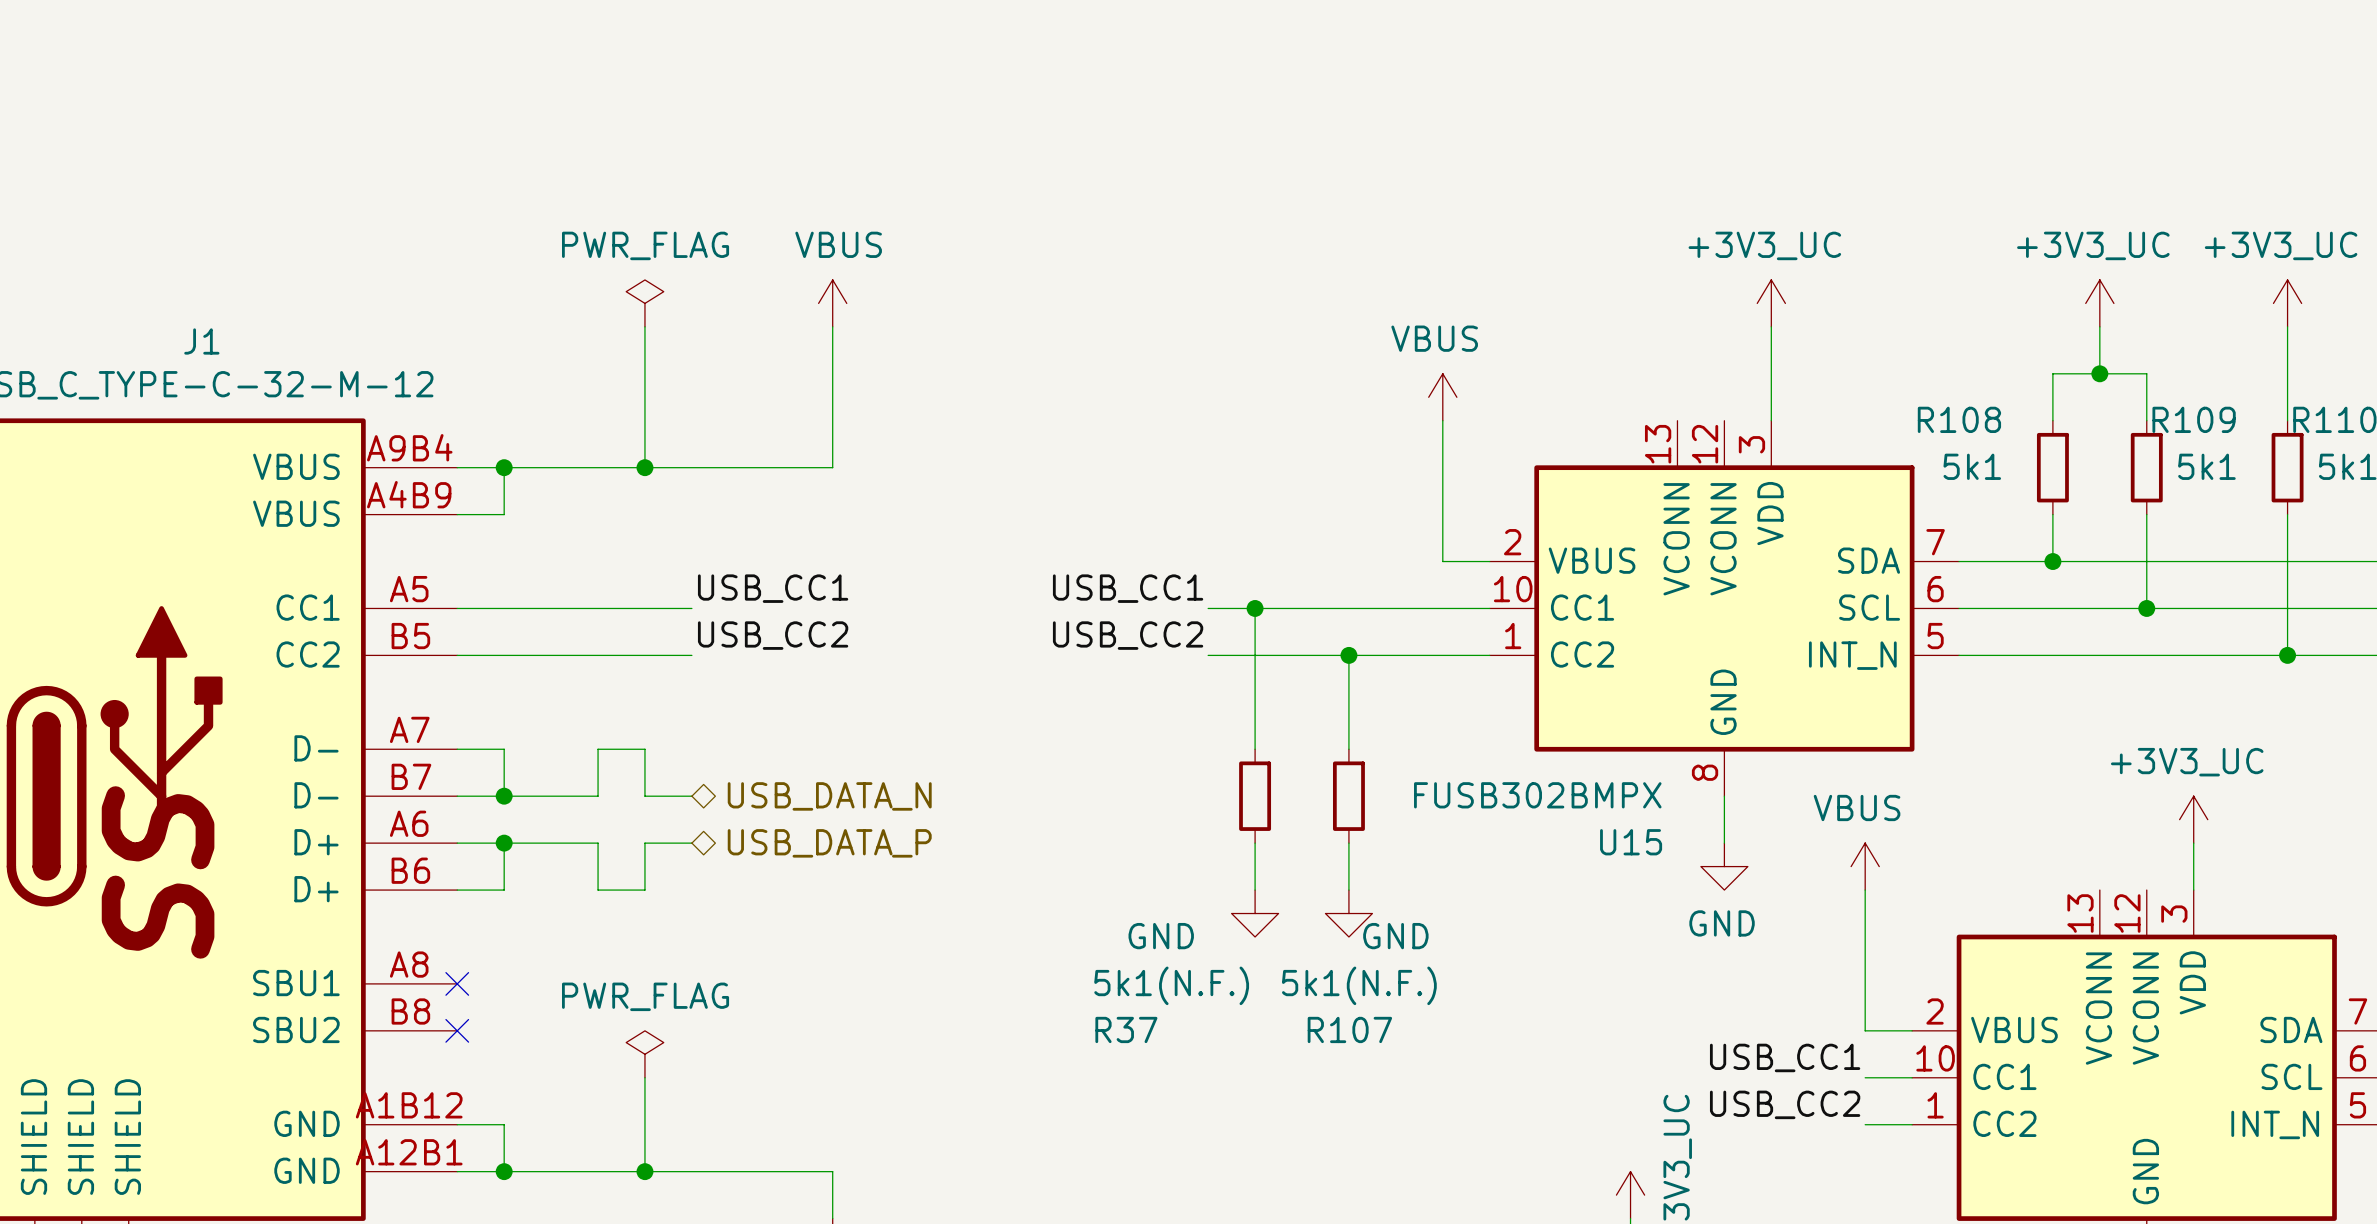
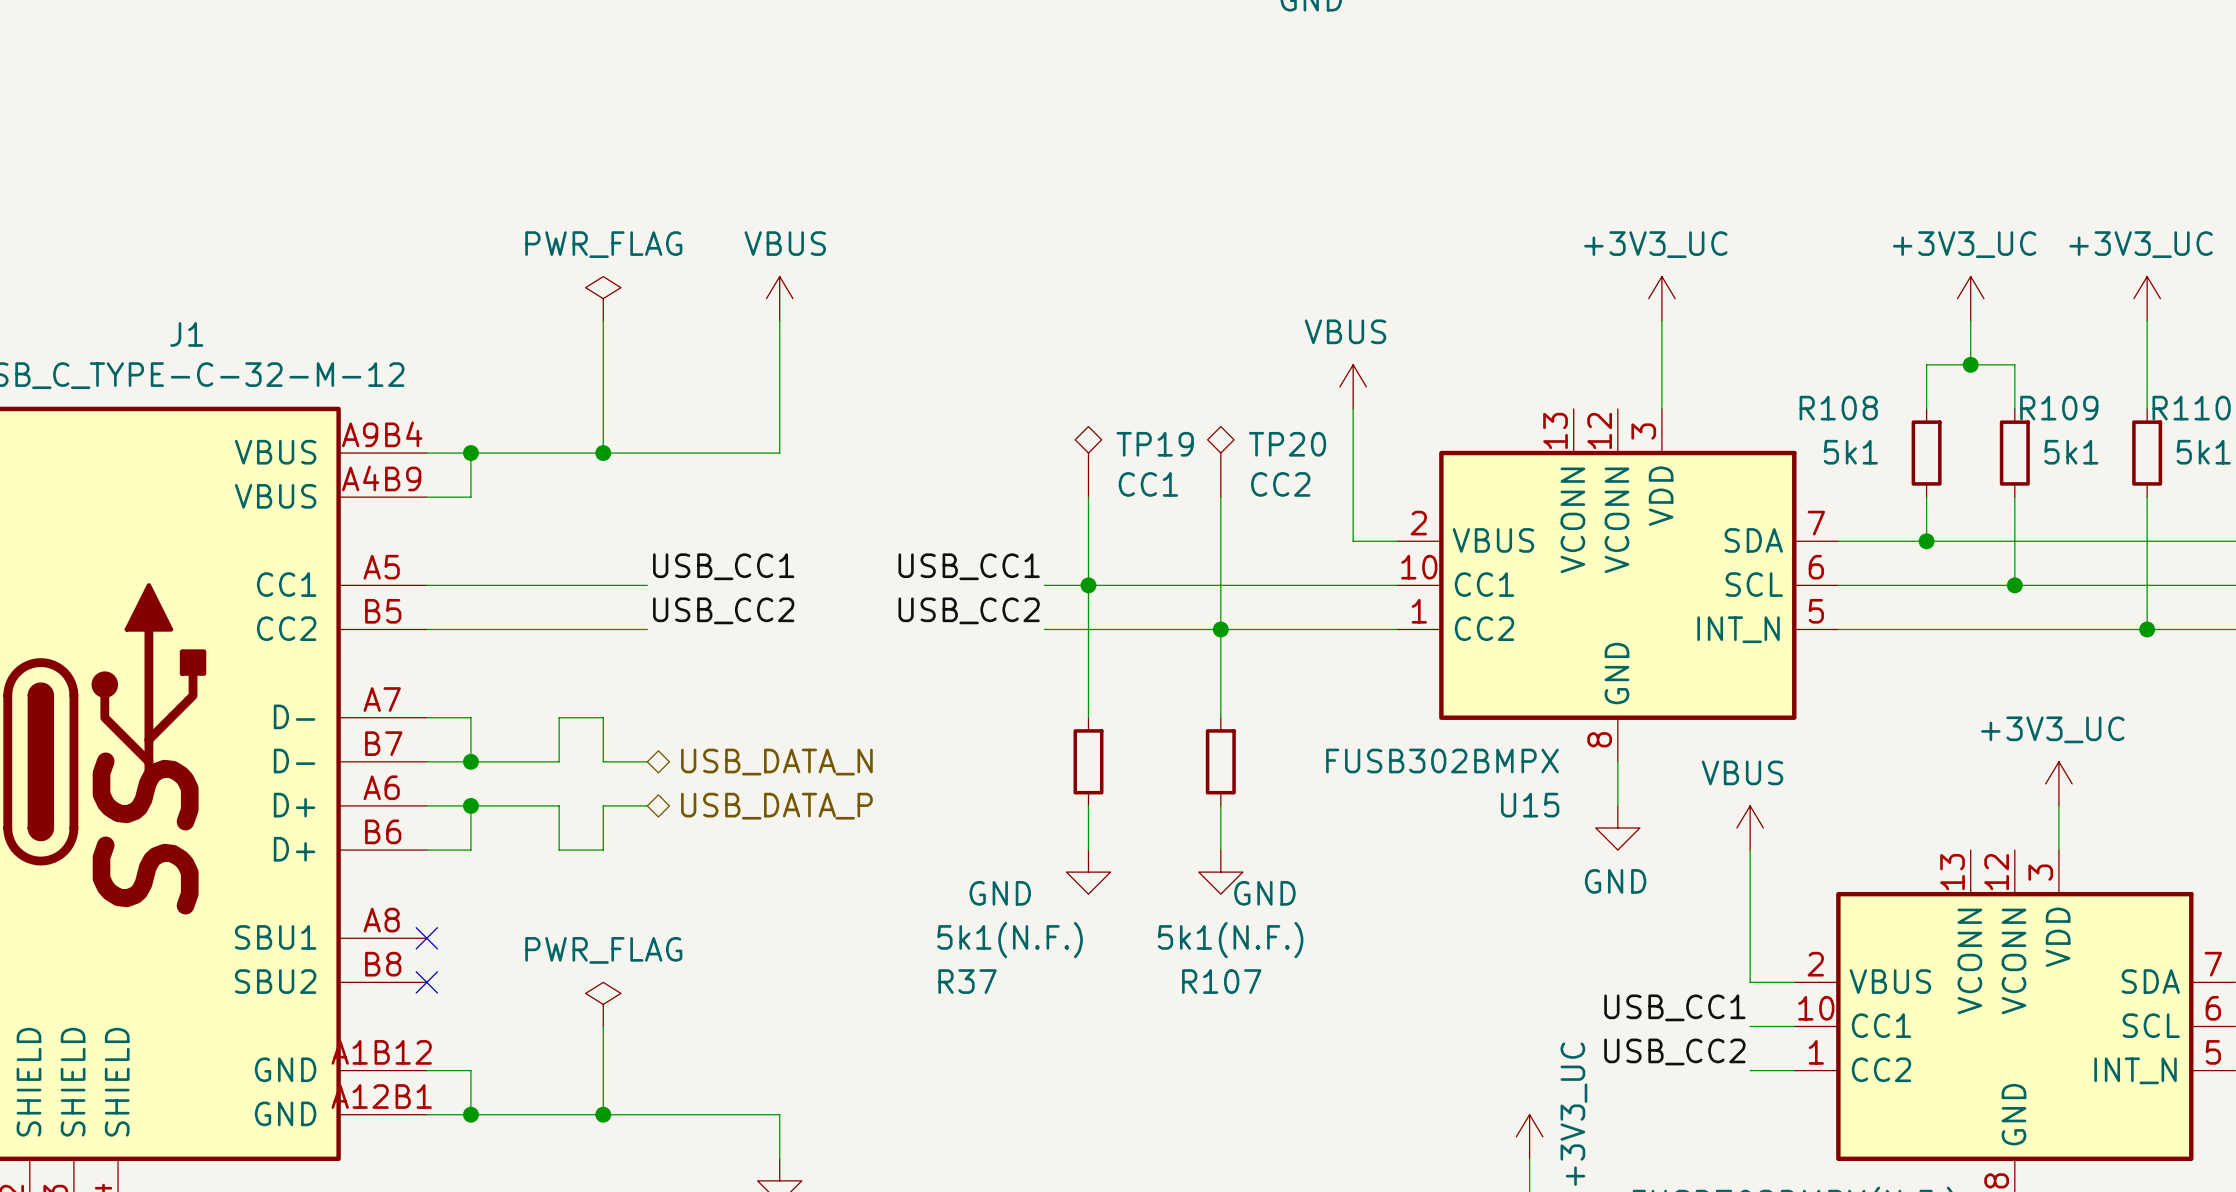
TP19: none -> CC1 (1088, 461)
TP20: none -> CC2 (1220, 461)
wire: none -> (1088, 497) (1088, 717)
wire: none -> (1220, 497) (1220, 717)
label position: USB_CC1 (1128, 588) -> USB_CC1 (969, 566)
wire: none -> (1044, 585) (1132, 585)
junction: none -> (1088, 585)
wire: (1255, 608) (1255, 749) -> none
junction: (1255, 608) -> none
label position: USB_CC2 (1128, 635) -> USB_CC2 (969, 610)
wire: none -> (1044, 629) (1132, 629)
junction: none -> (1220, 629)
wire: (1348, 655) (1348, 749) -> none
junction: (1348, 655) -> none
R37 position: (1255, 796) -> (1088, 761)
R107 position: (1348, 796) -> (1220, 761)
wire: (1255, 843) (1255, 890) -> (1220, 805) (1220, 850)
wire: (1348, 843) (1348, 890) -> (1088, 805) (1088, 850)
power symbol: none -> GND (1088, 872)
power symbol: GND (1255, 913) -> none
power symbol: none -> GND (1220, 872)
power symbol: GND (1348, 913) -> none

